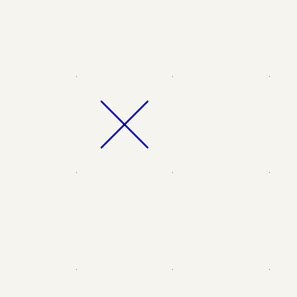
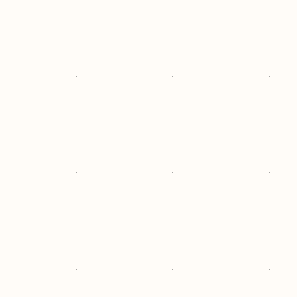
no-connect mark: (124, 124) -> none

